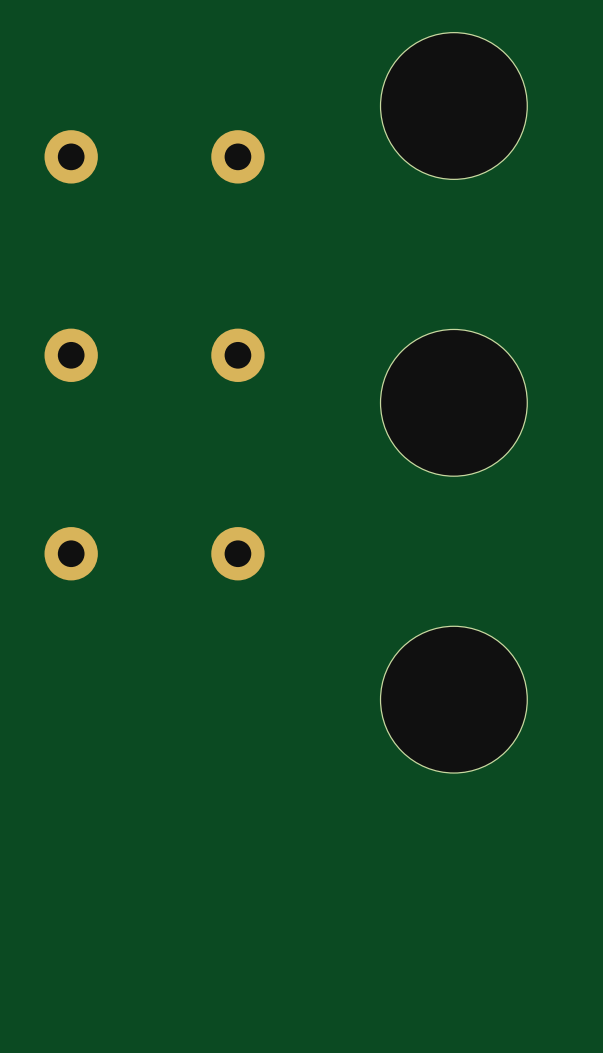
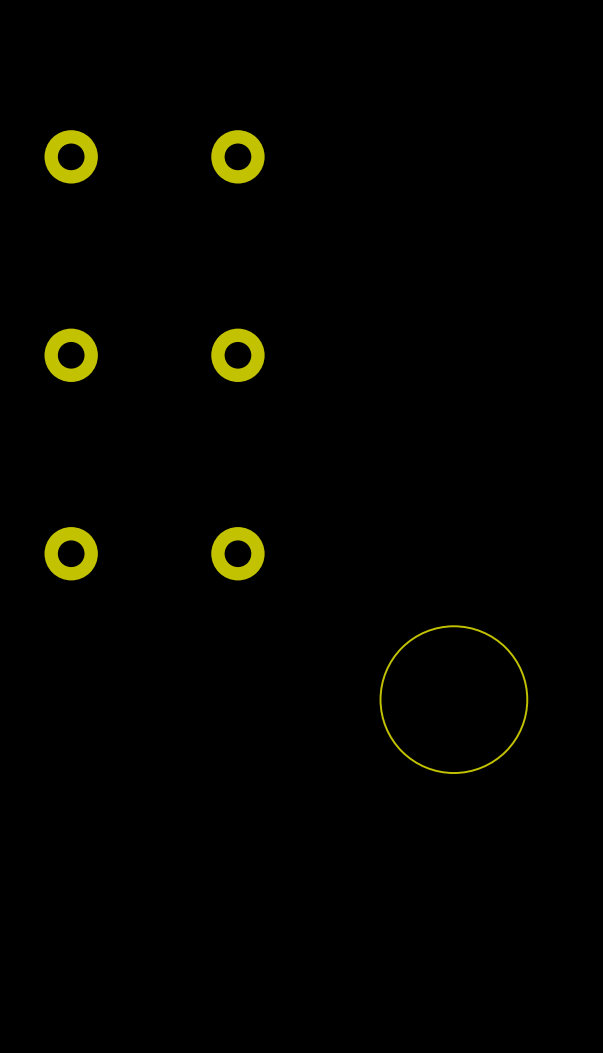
part: (453, 106) -> none
part: (453, 402) -> none

